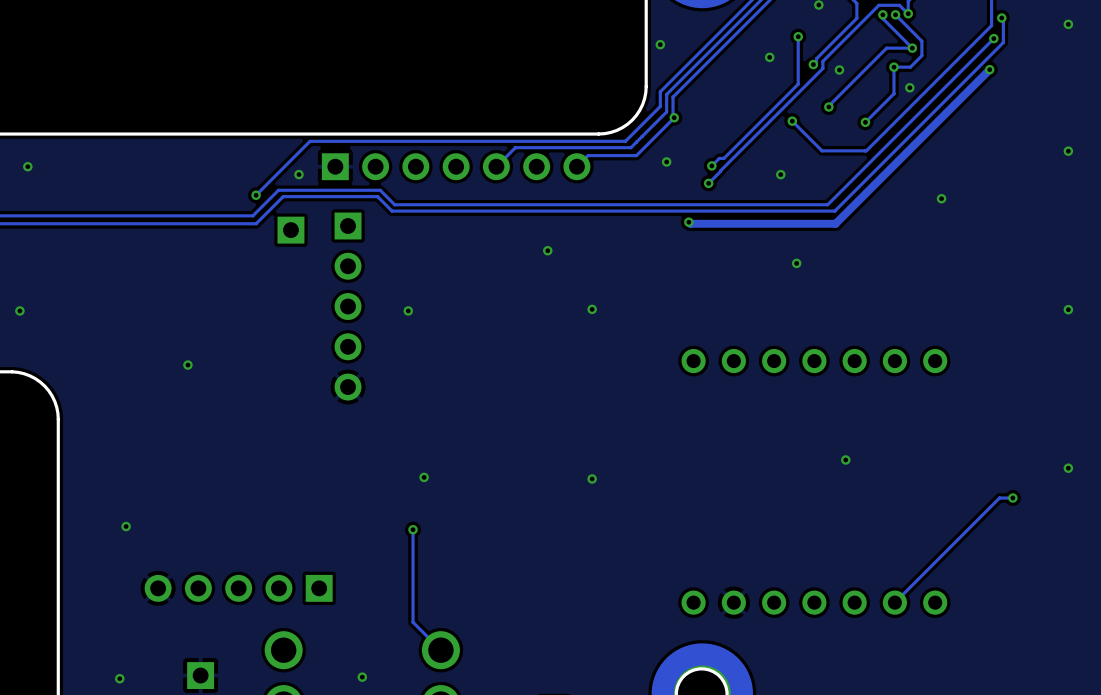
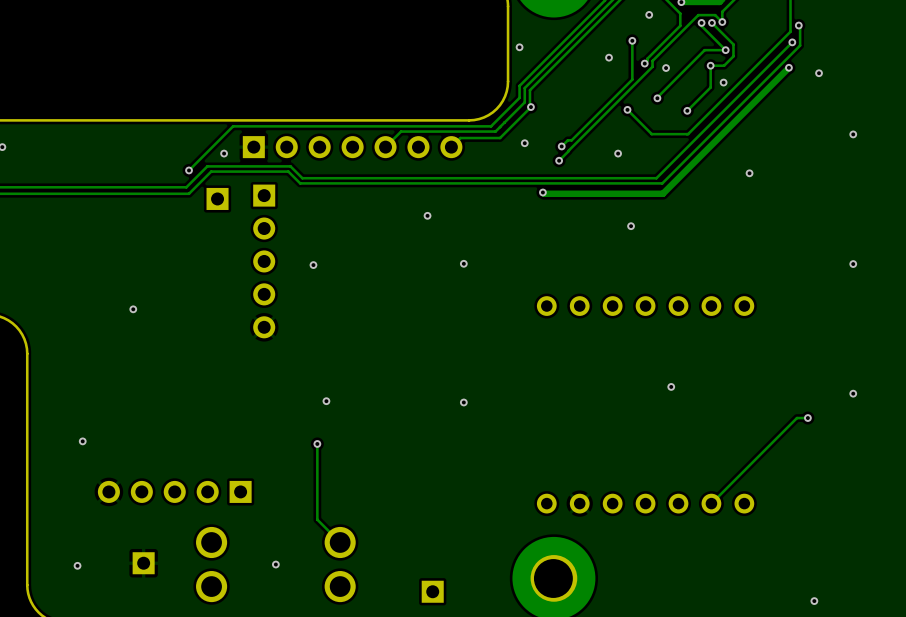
via position: (1068, 24) -> (819, 73)

